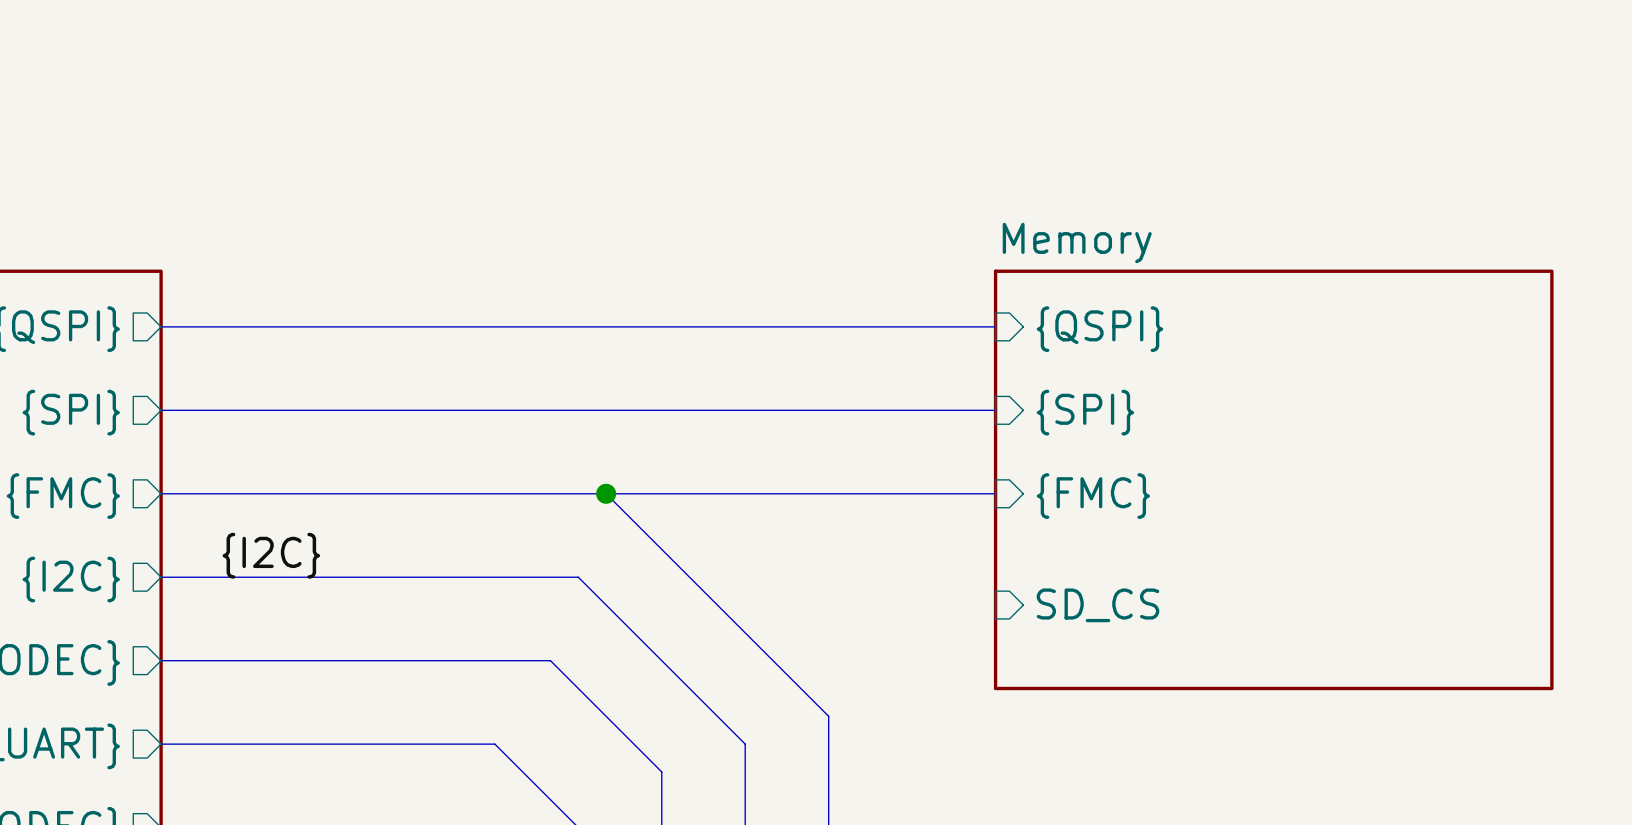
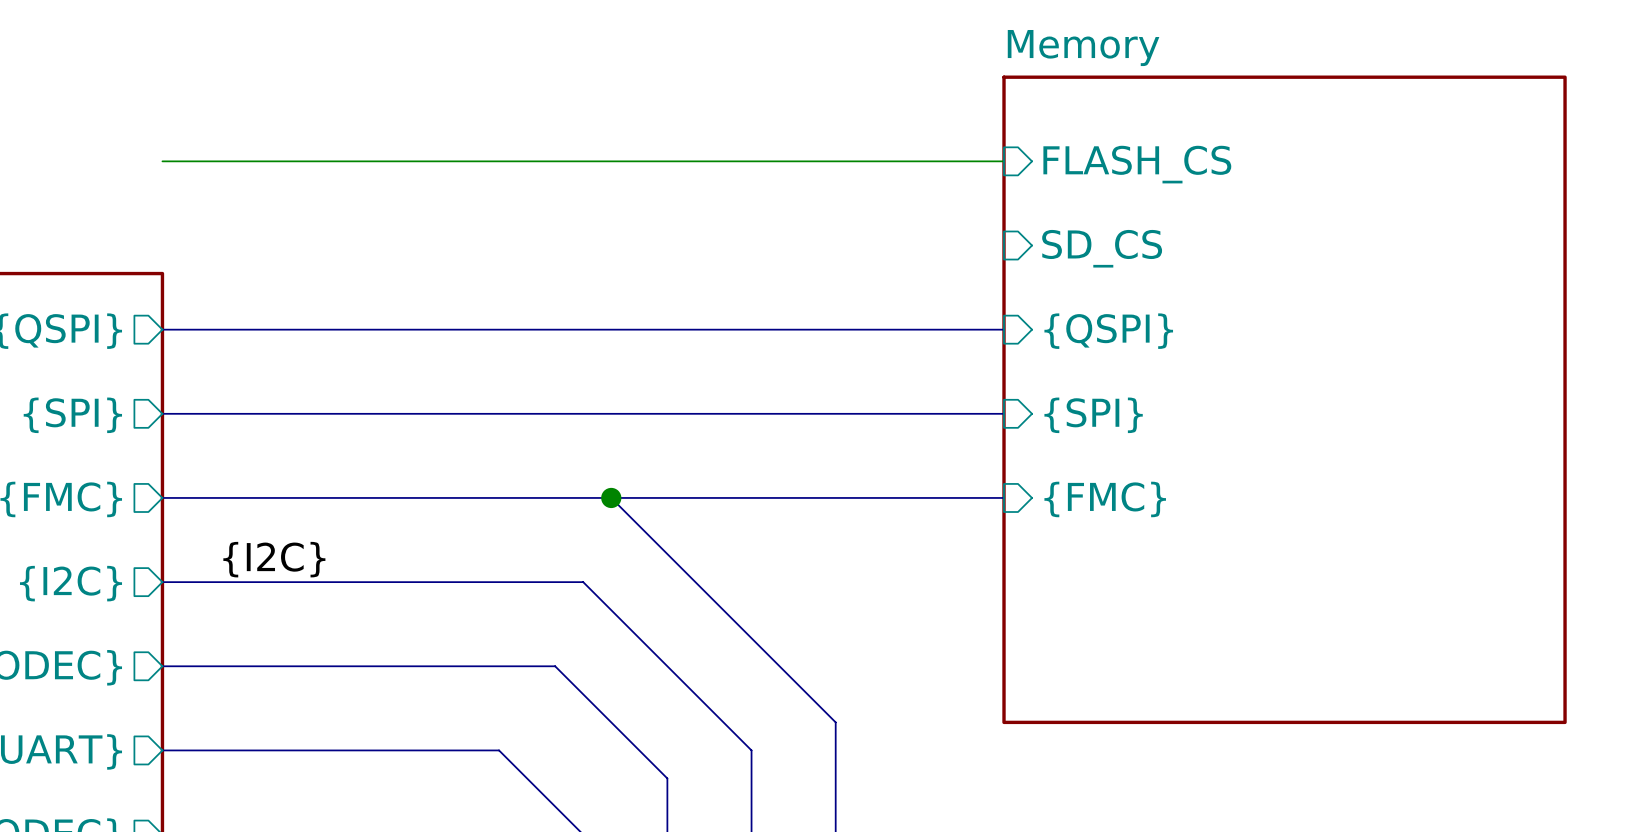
wire: none -> (162, 161) (1004, 161)
sheet pin: none -> FLASH_CS (1137, 164)
sheet Memory: none -> (1284, 399)
sheet Memory: (1273, 479) -> none
sheet pin position: SD_CS (1097, 605) -> SD_CS (1102, 248)

